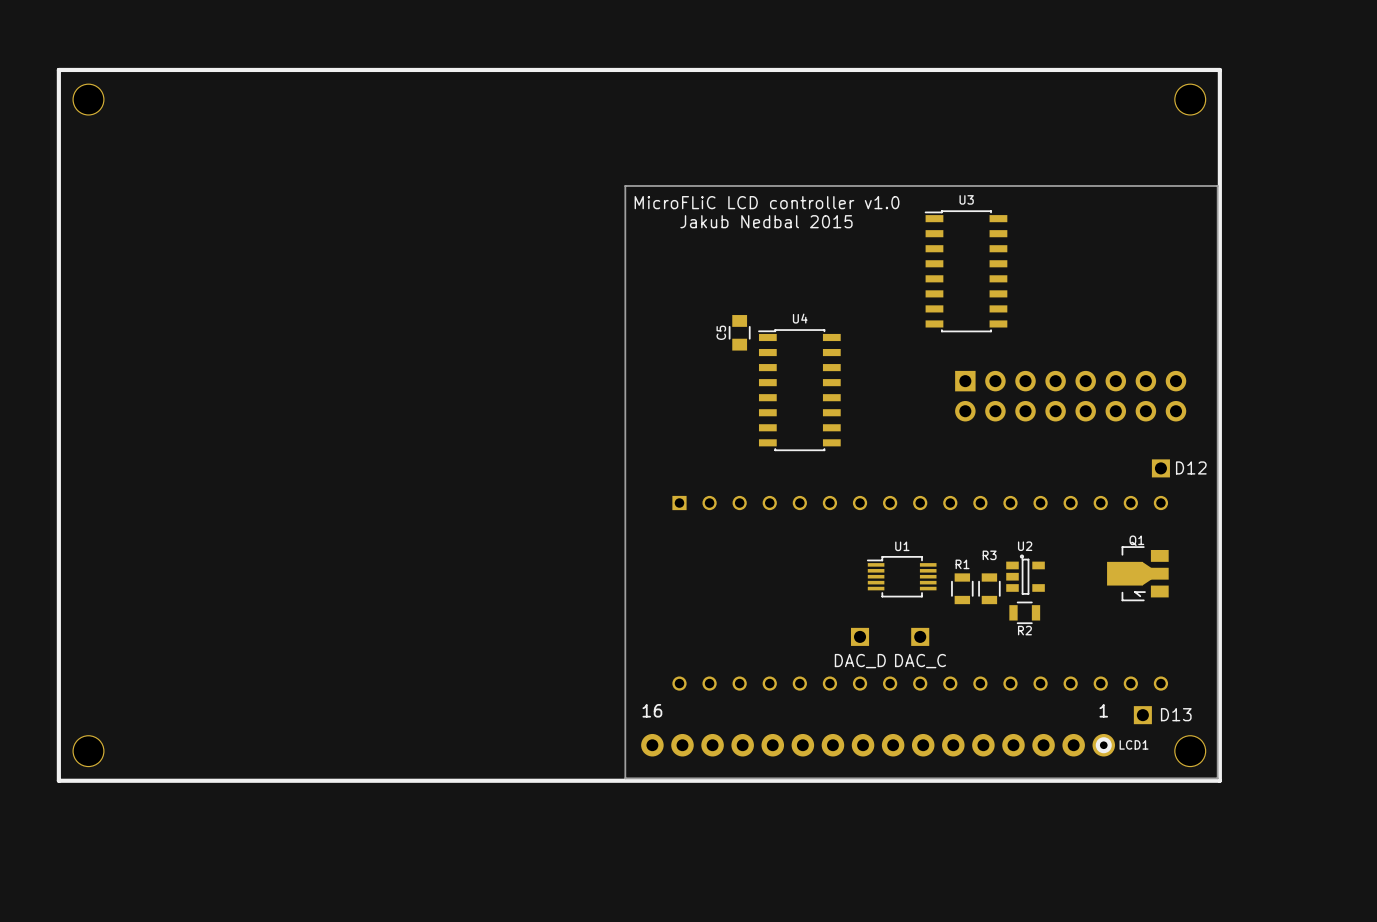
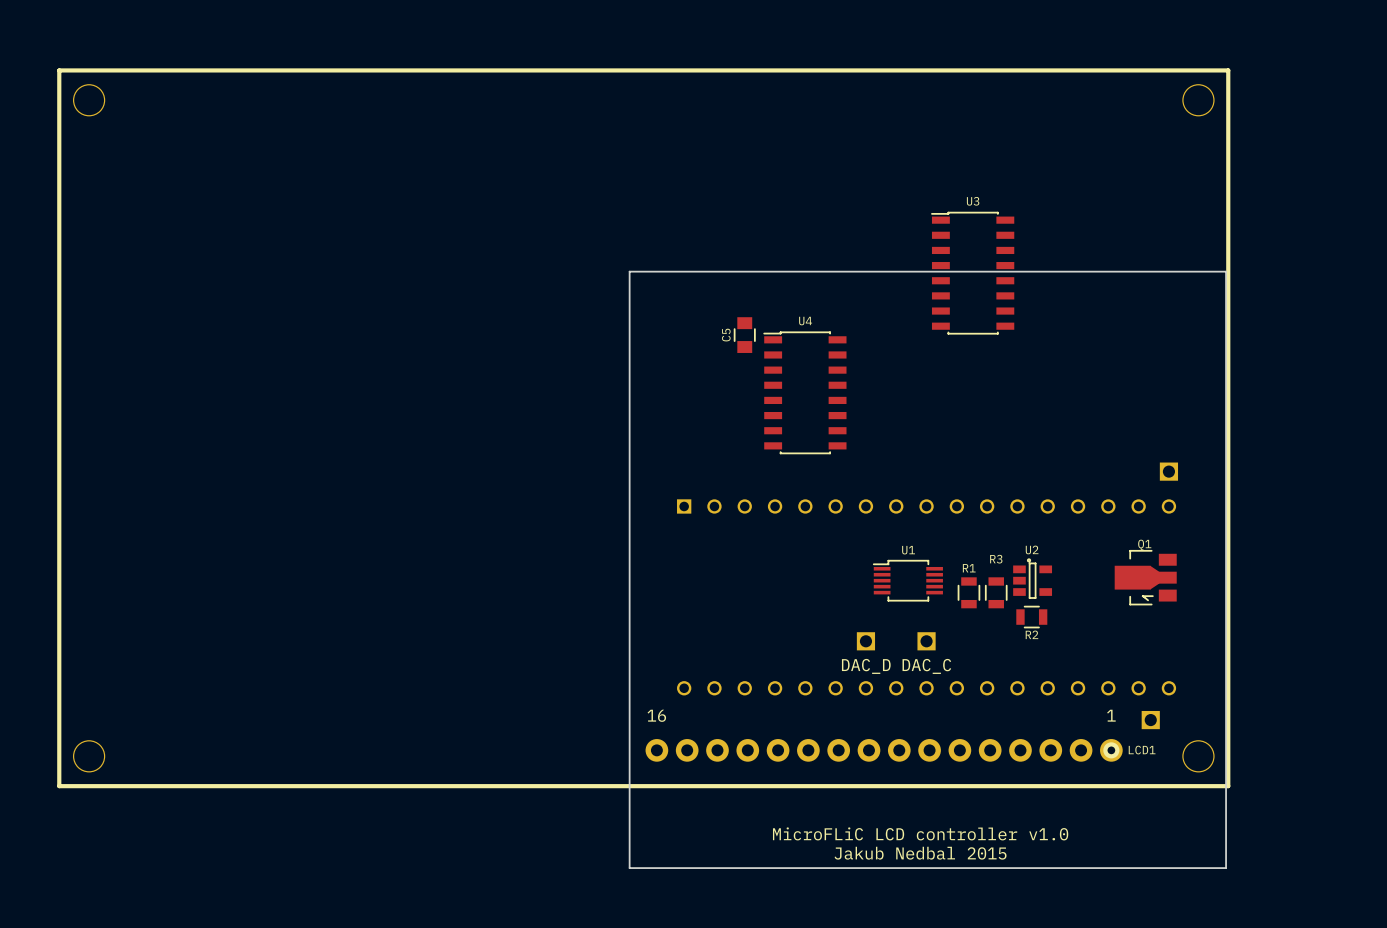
text: MicroFLiC LCD controller v1.0 (767, 202) -> none
text: Jakub Nedbal 2015 (766, 221) -> none
board edge: (625, 269) (625, 185) (1217, 185) (1217, 269) -> (629, 271) (1226, 271)
part: (1070, 396) -> none
text: D12 (1191, 467) -> none
text: D13 (1176, 714) -> none
board edge: (625, 778) (1217, 778) -> (629, 783) (629, 868) (1226, 868) (1226, 783)
text: none -> MicroFLiC LCD controller v1.0 (920, 833)
text: none -> Jakub Nedbal 2015 (920, 853)

